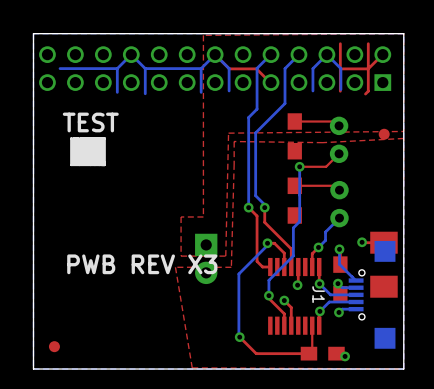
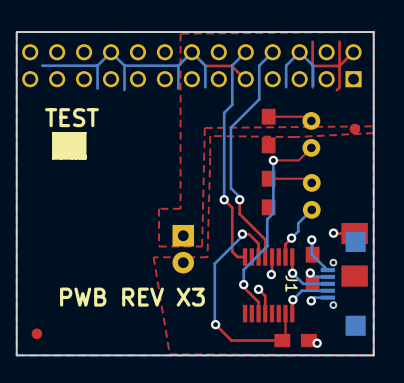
text position: PWB REV X3 (142, 264) -> PWB REV X3 (132, 297)

